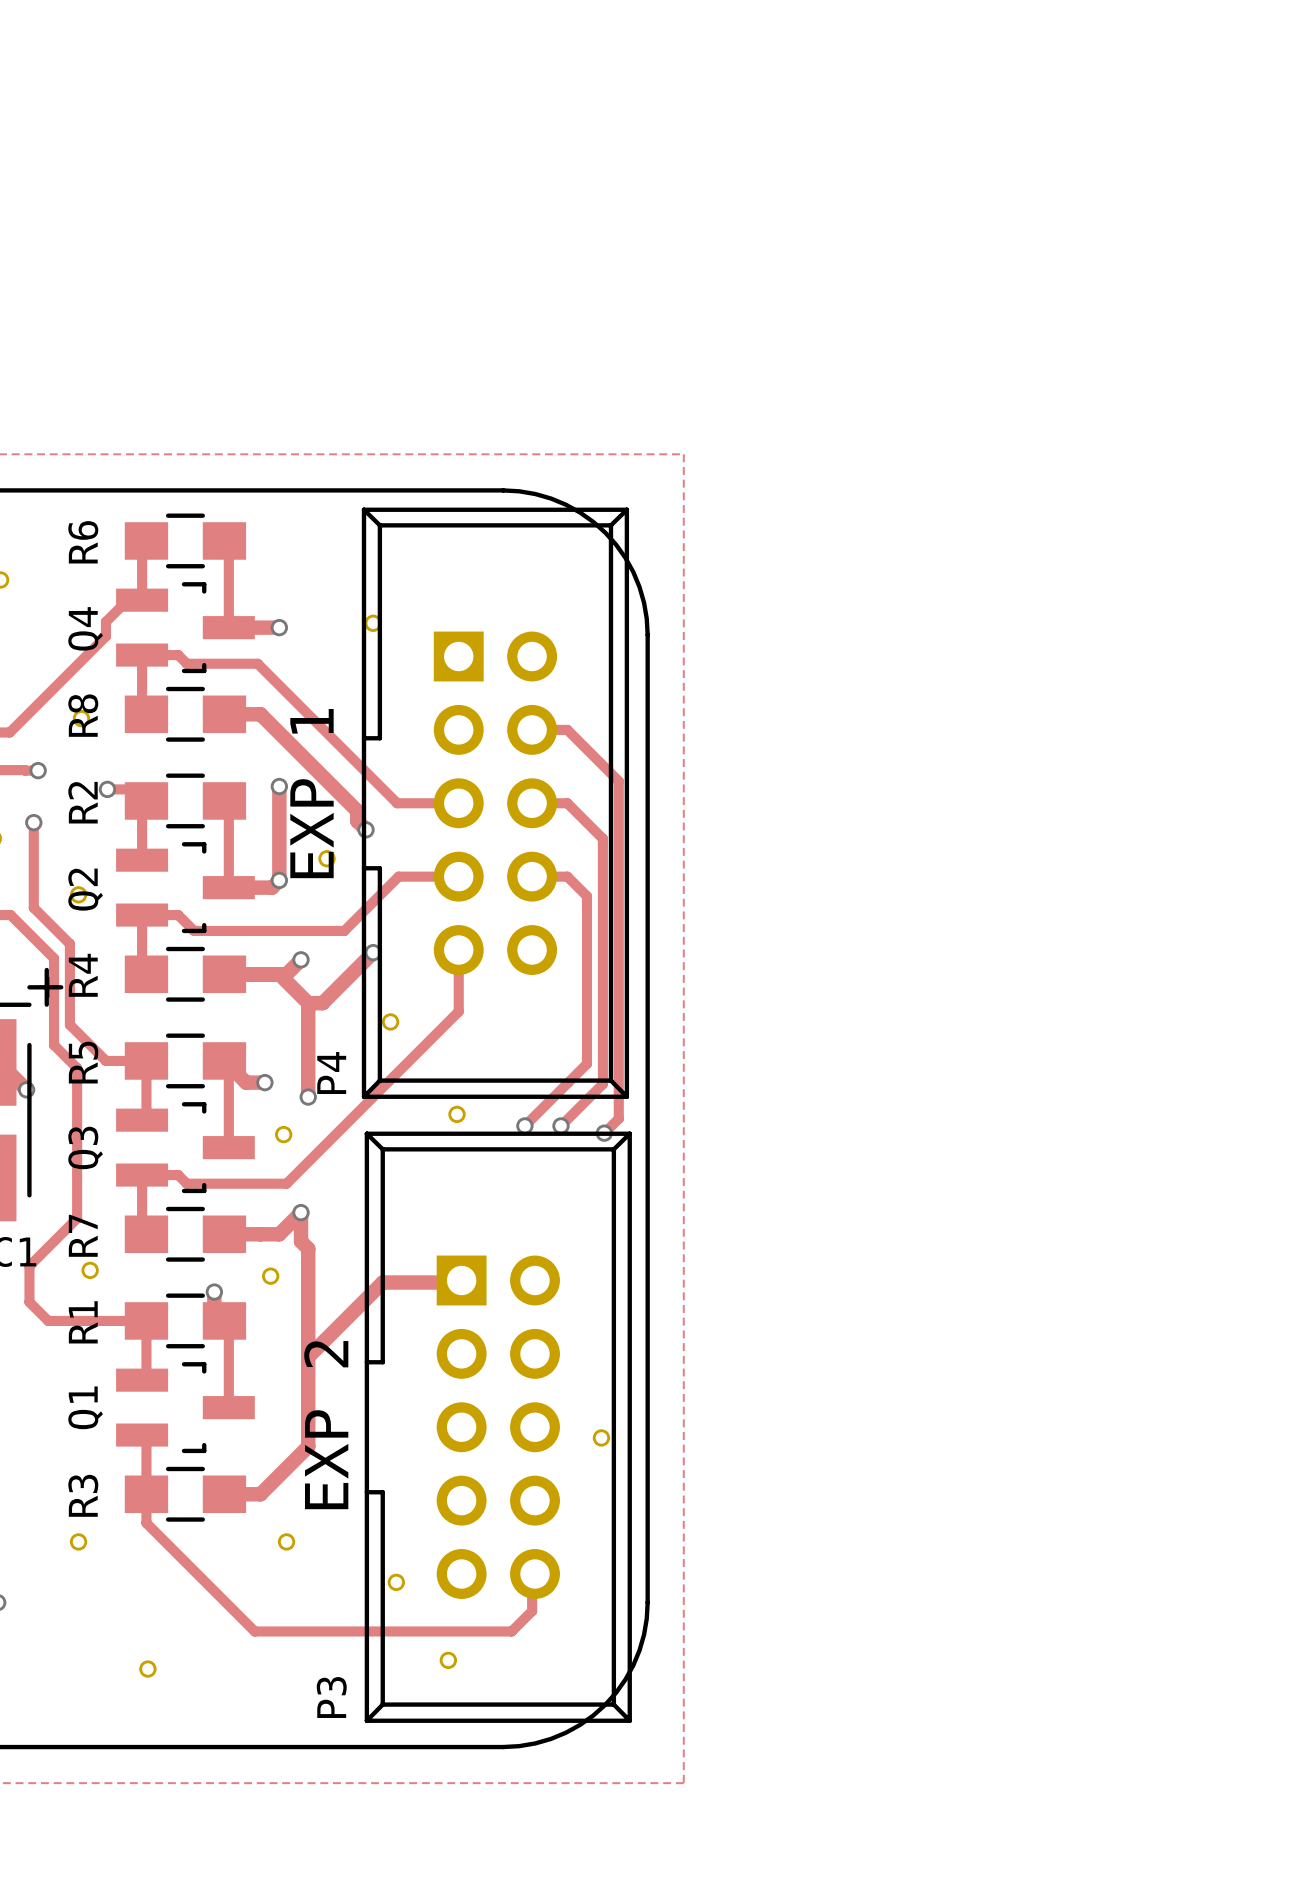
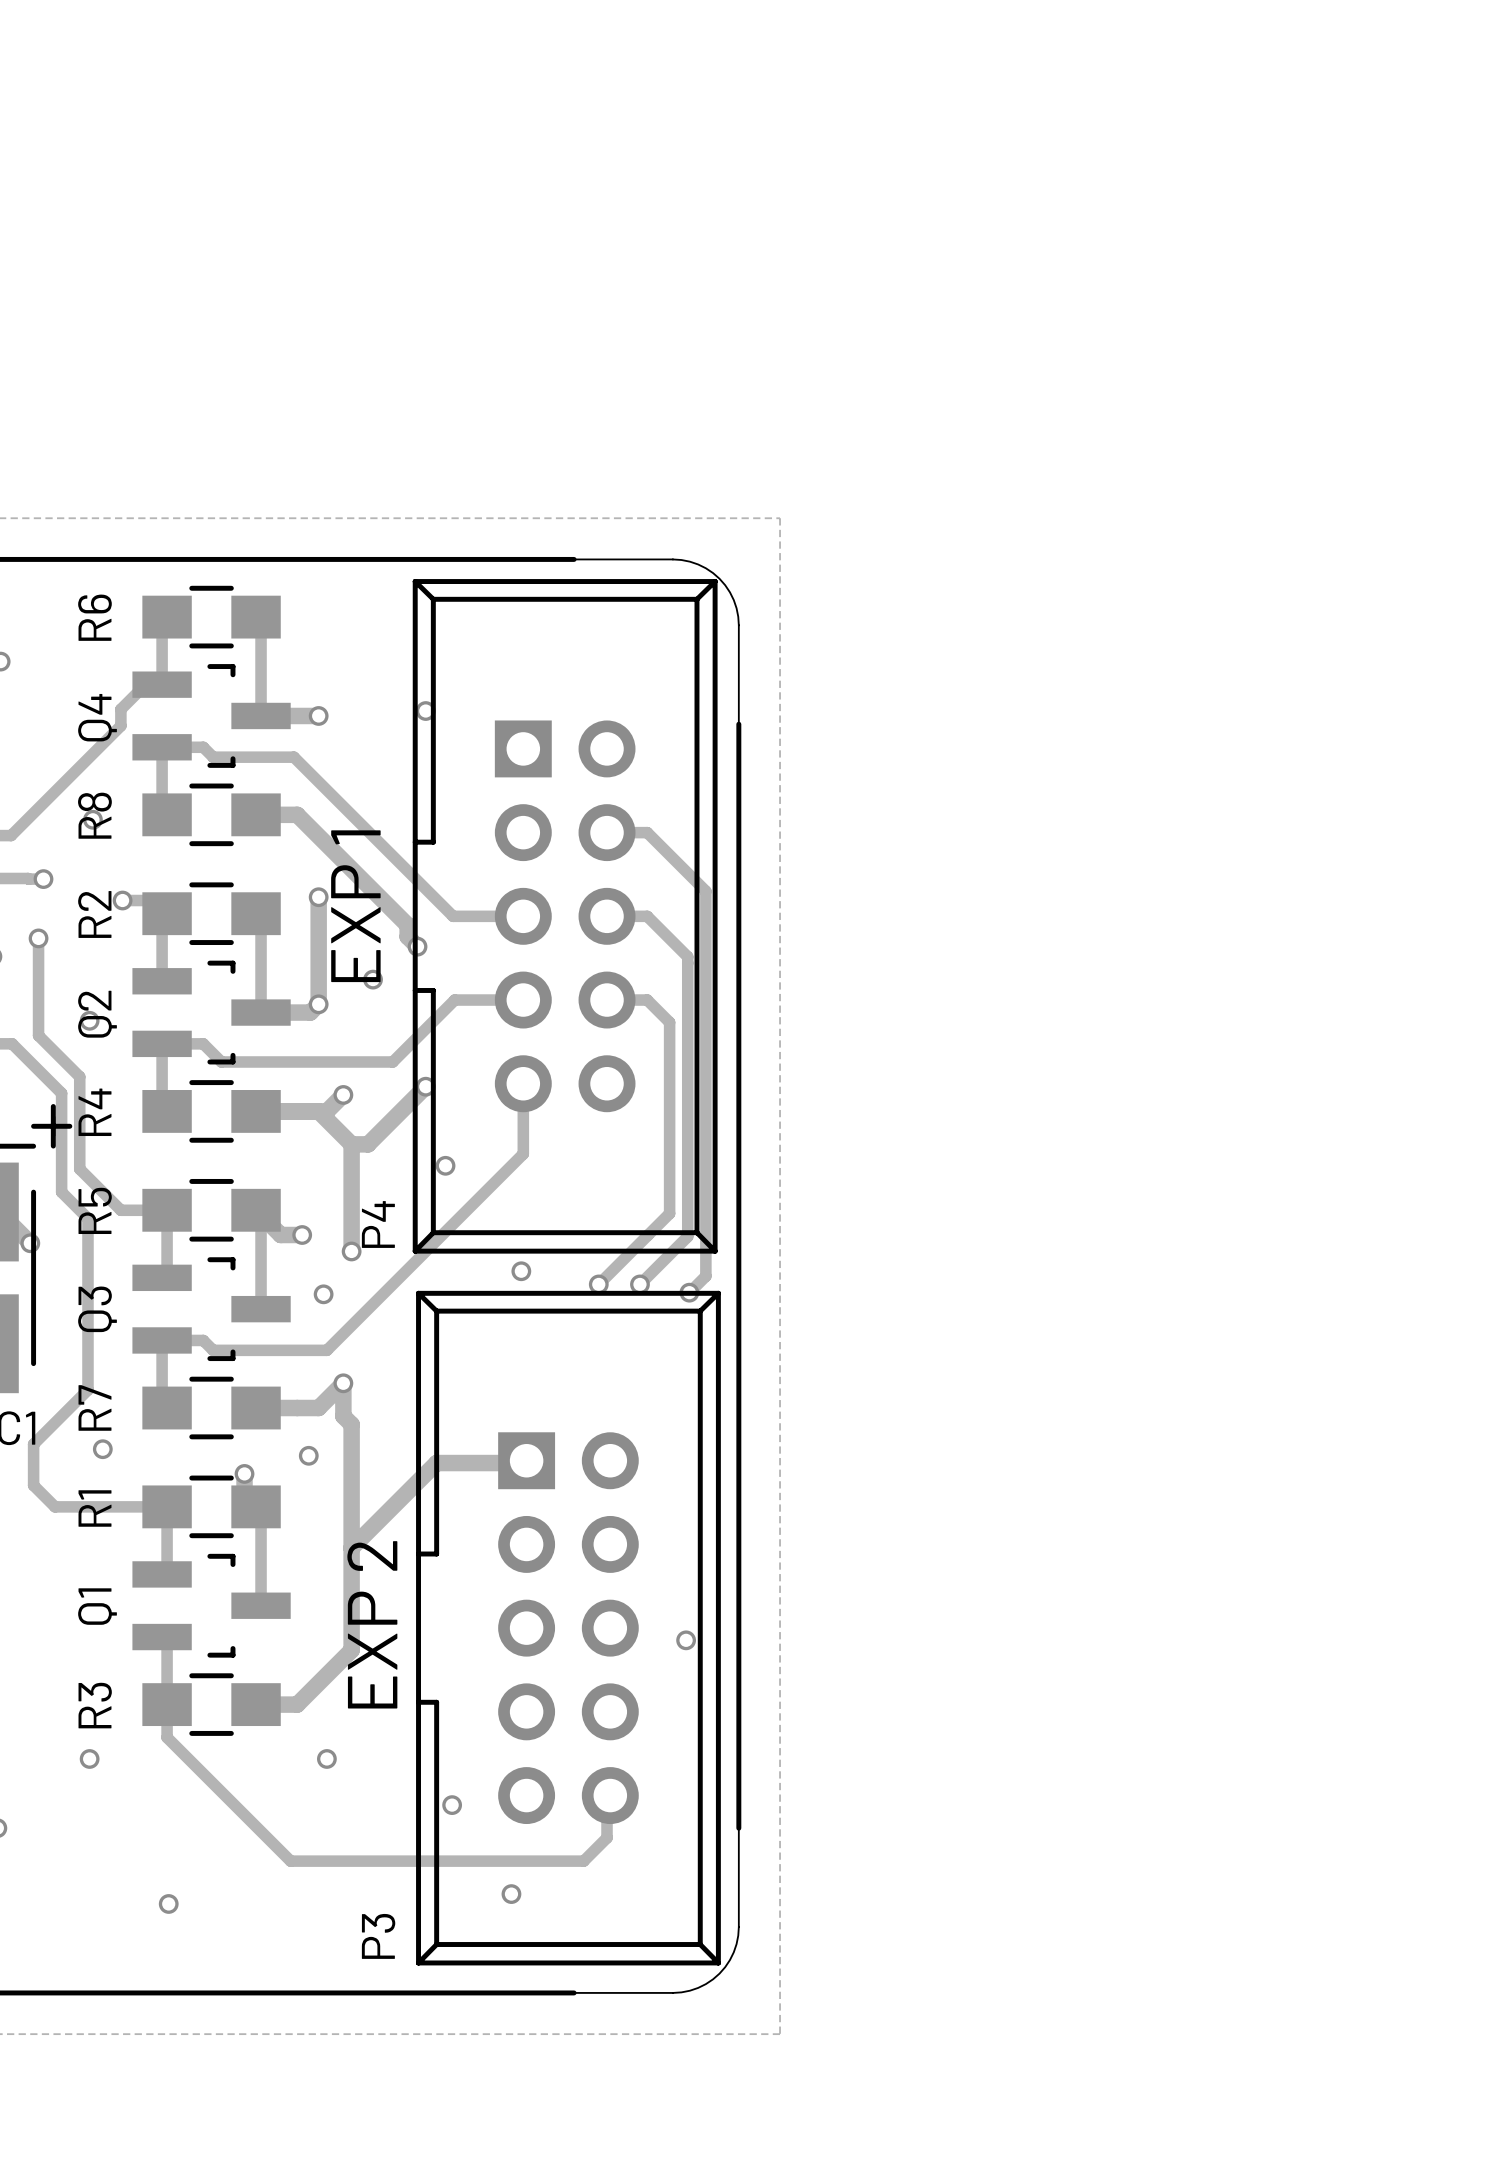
board edge: (503, 490) (519, 491) (550, 498) (580, 512) (605, 532) (625, 558) (639, 587) (646, 618) (647, 634) -> (574, 559) (681, 560) (705, 568) (719, 578) (733, 600) (738, 616) (738, 724)
board edge: (647, 1602) (646, 1618) (639, 1650) (625, 1679) (605, 1704) (580, 1724) (550, 1738) (519, 1746) (503, 1747) -> (738, 1828) (738, 1935) (733, 1952) (719, 1973) (698, 1987) (681, 1992) (574, 1992)

